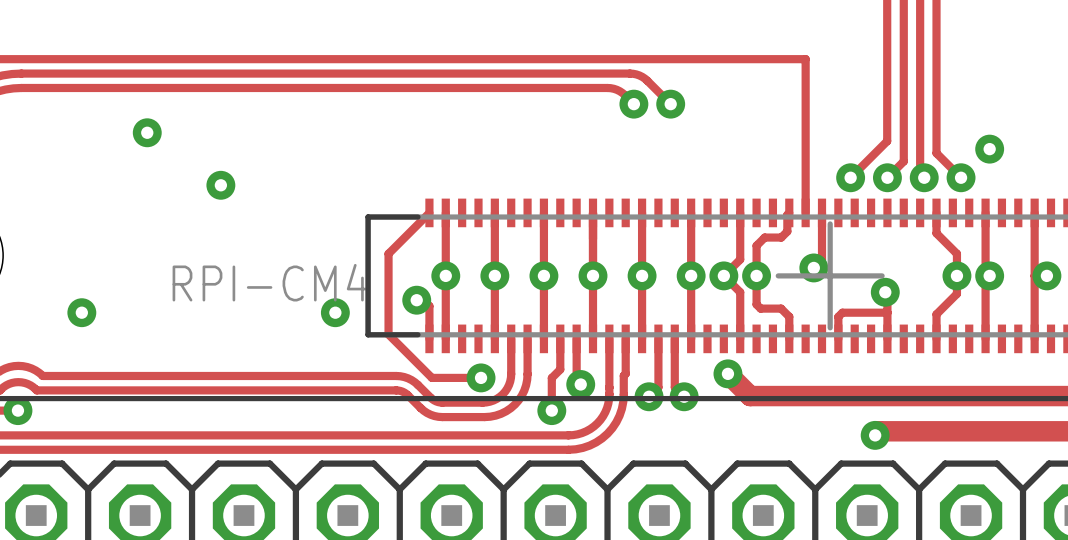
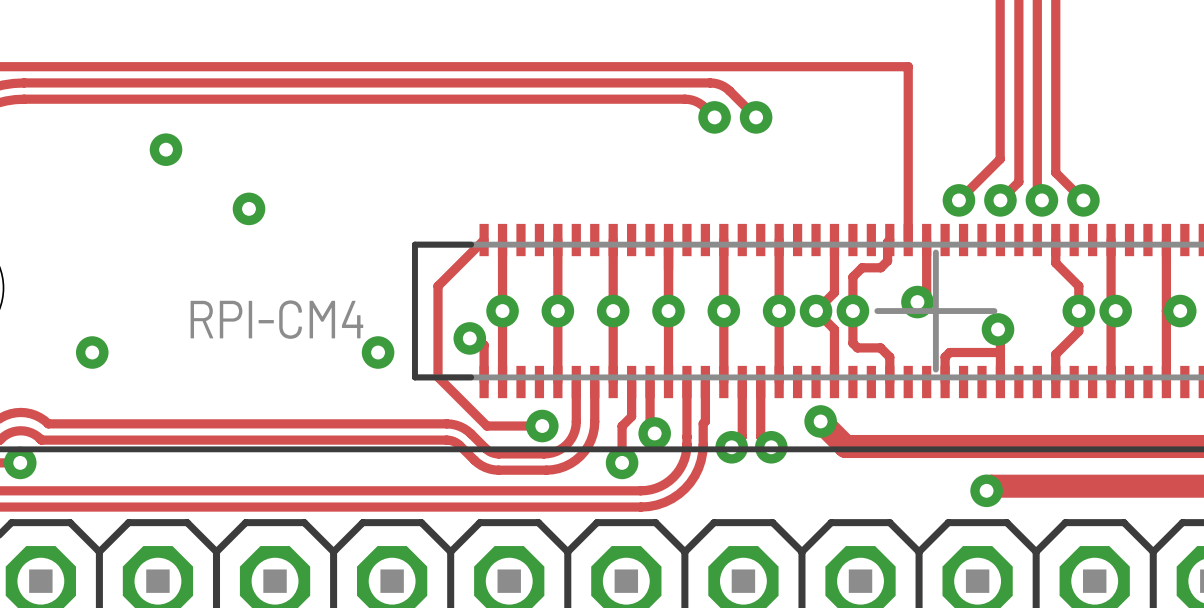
via: (989, 149) -> none

